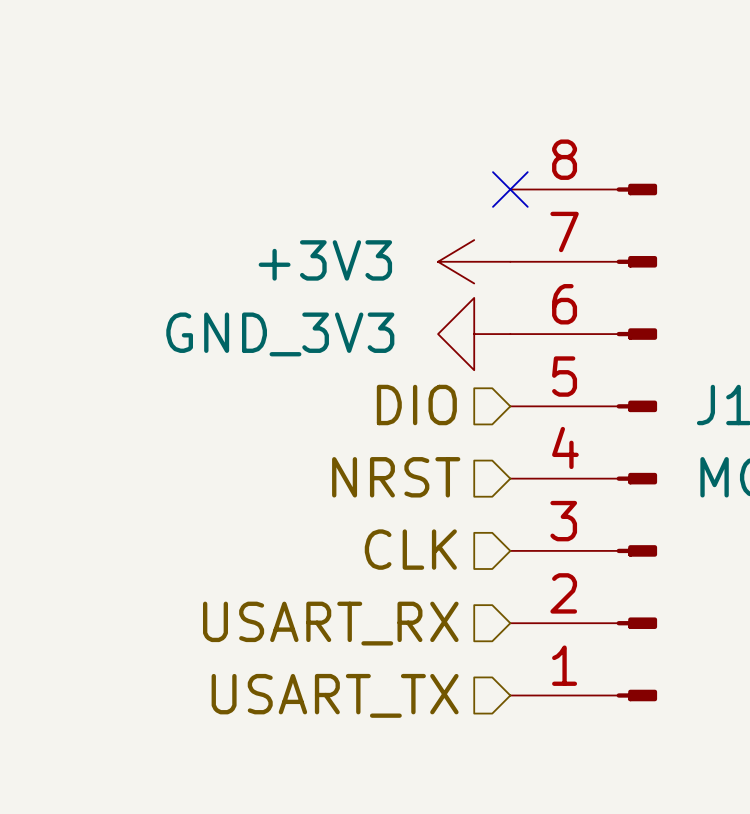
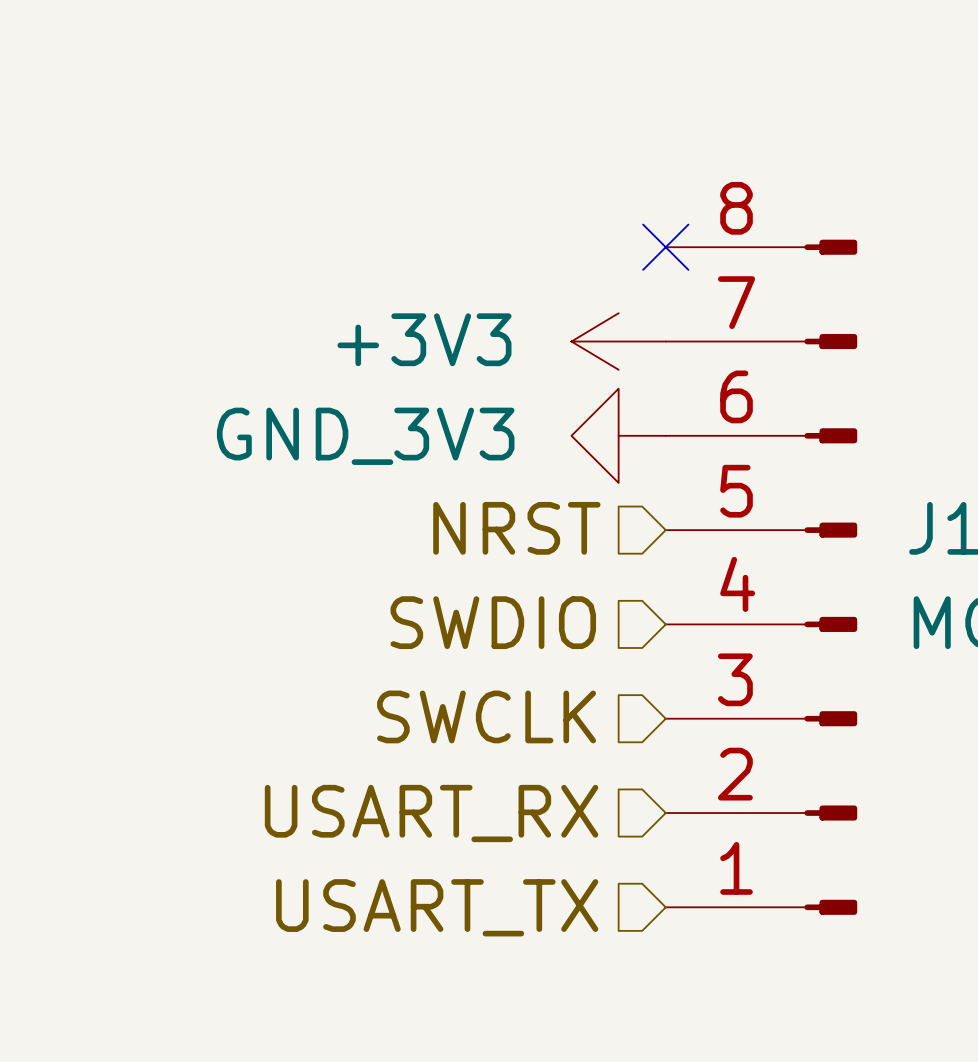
hierarchical label: DIO (416, 405) -> NRST (516, 528)
hierarchical label: NRST (396, 477) -> SWDIO (493, 622)
hierarchical label: CLK (410, 549) -> SWCLK (486, 716)

